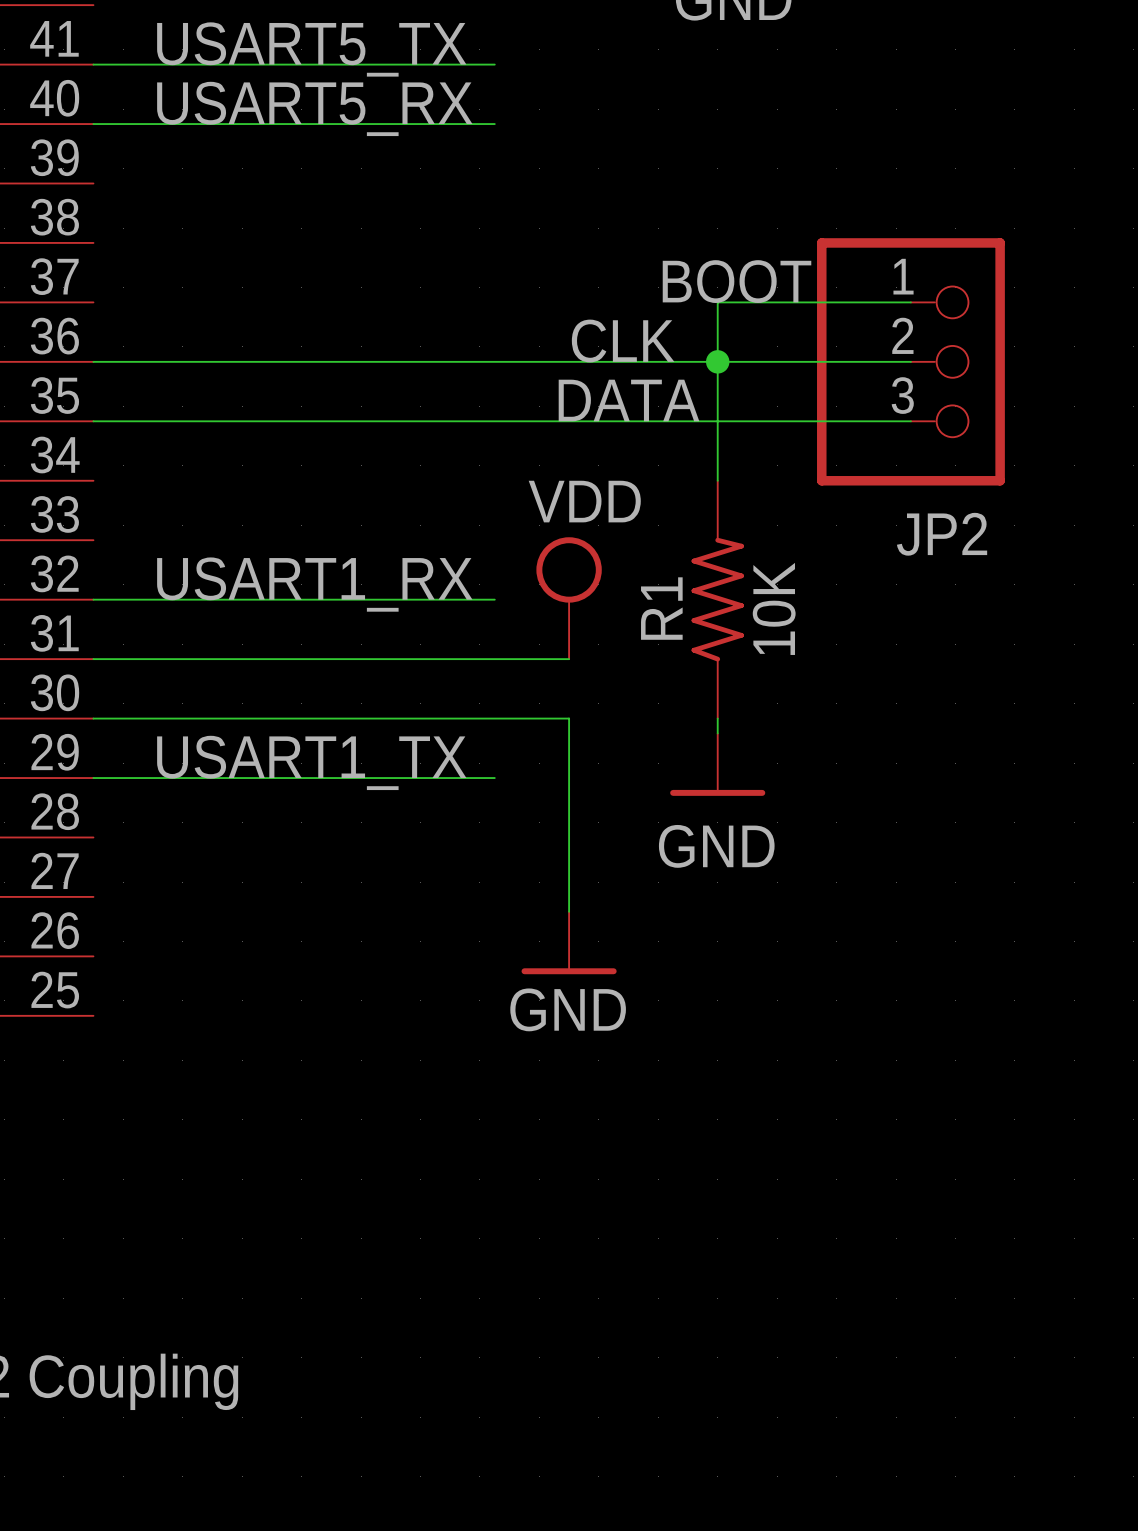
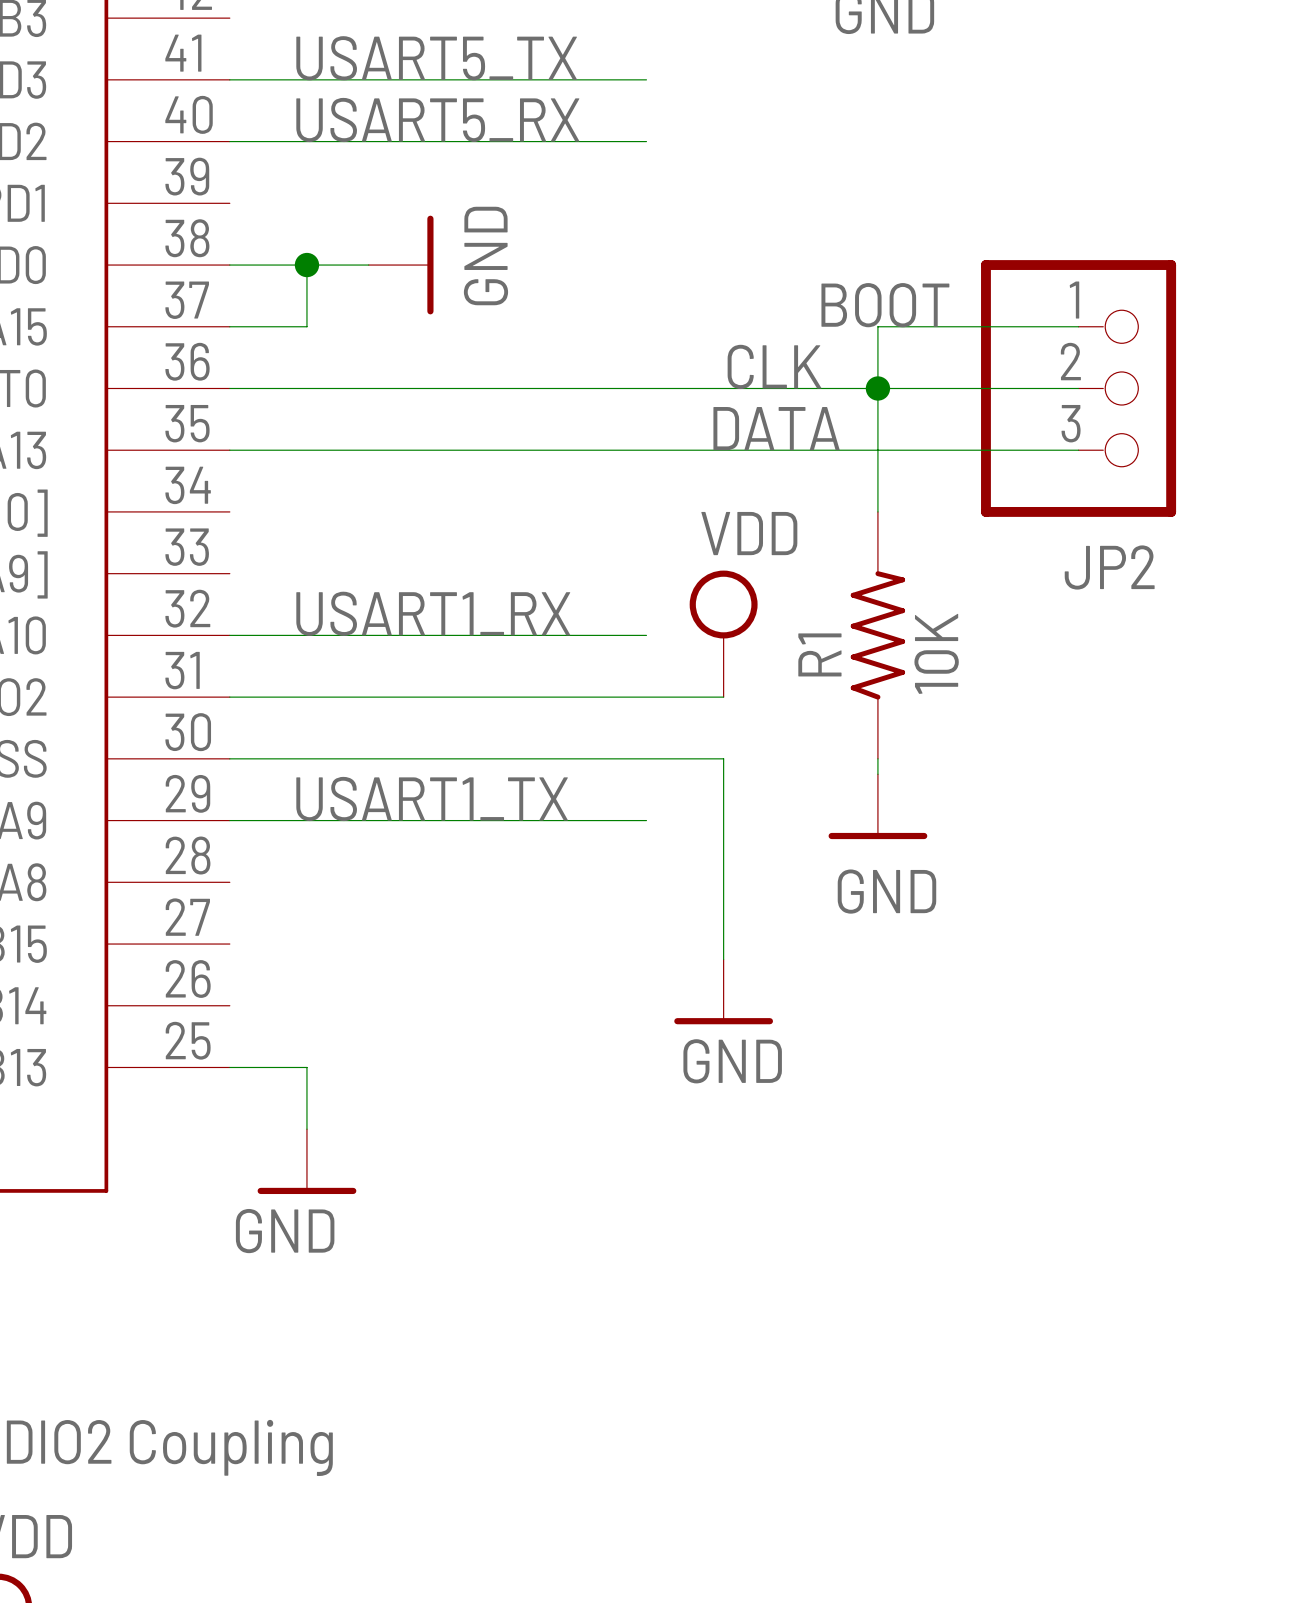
wire: none -> (229, 265) (368, 265)
wire: none -> (306, 265) (306, 326) (229, 326)
junction: none -> (306, 265)
power symbol: none -> GND (401, 265)
wire: none -> (229, 1067) (306, 1067) (306, 1129)
power symbol: none -> GND (306, 1161)

